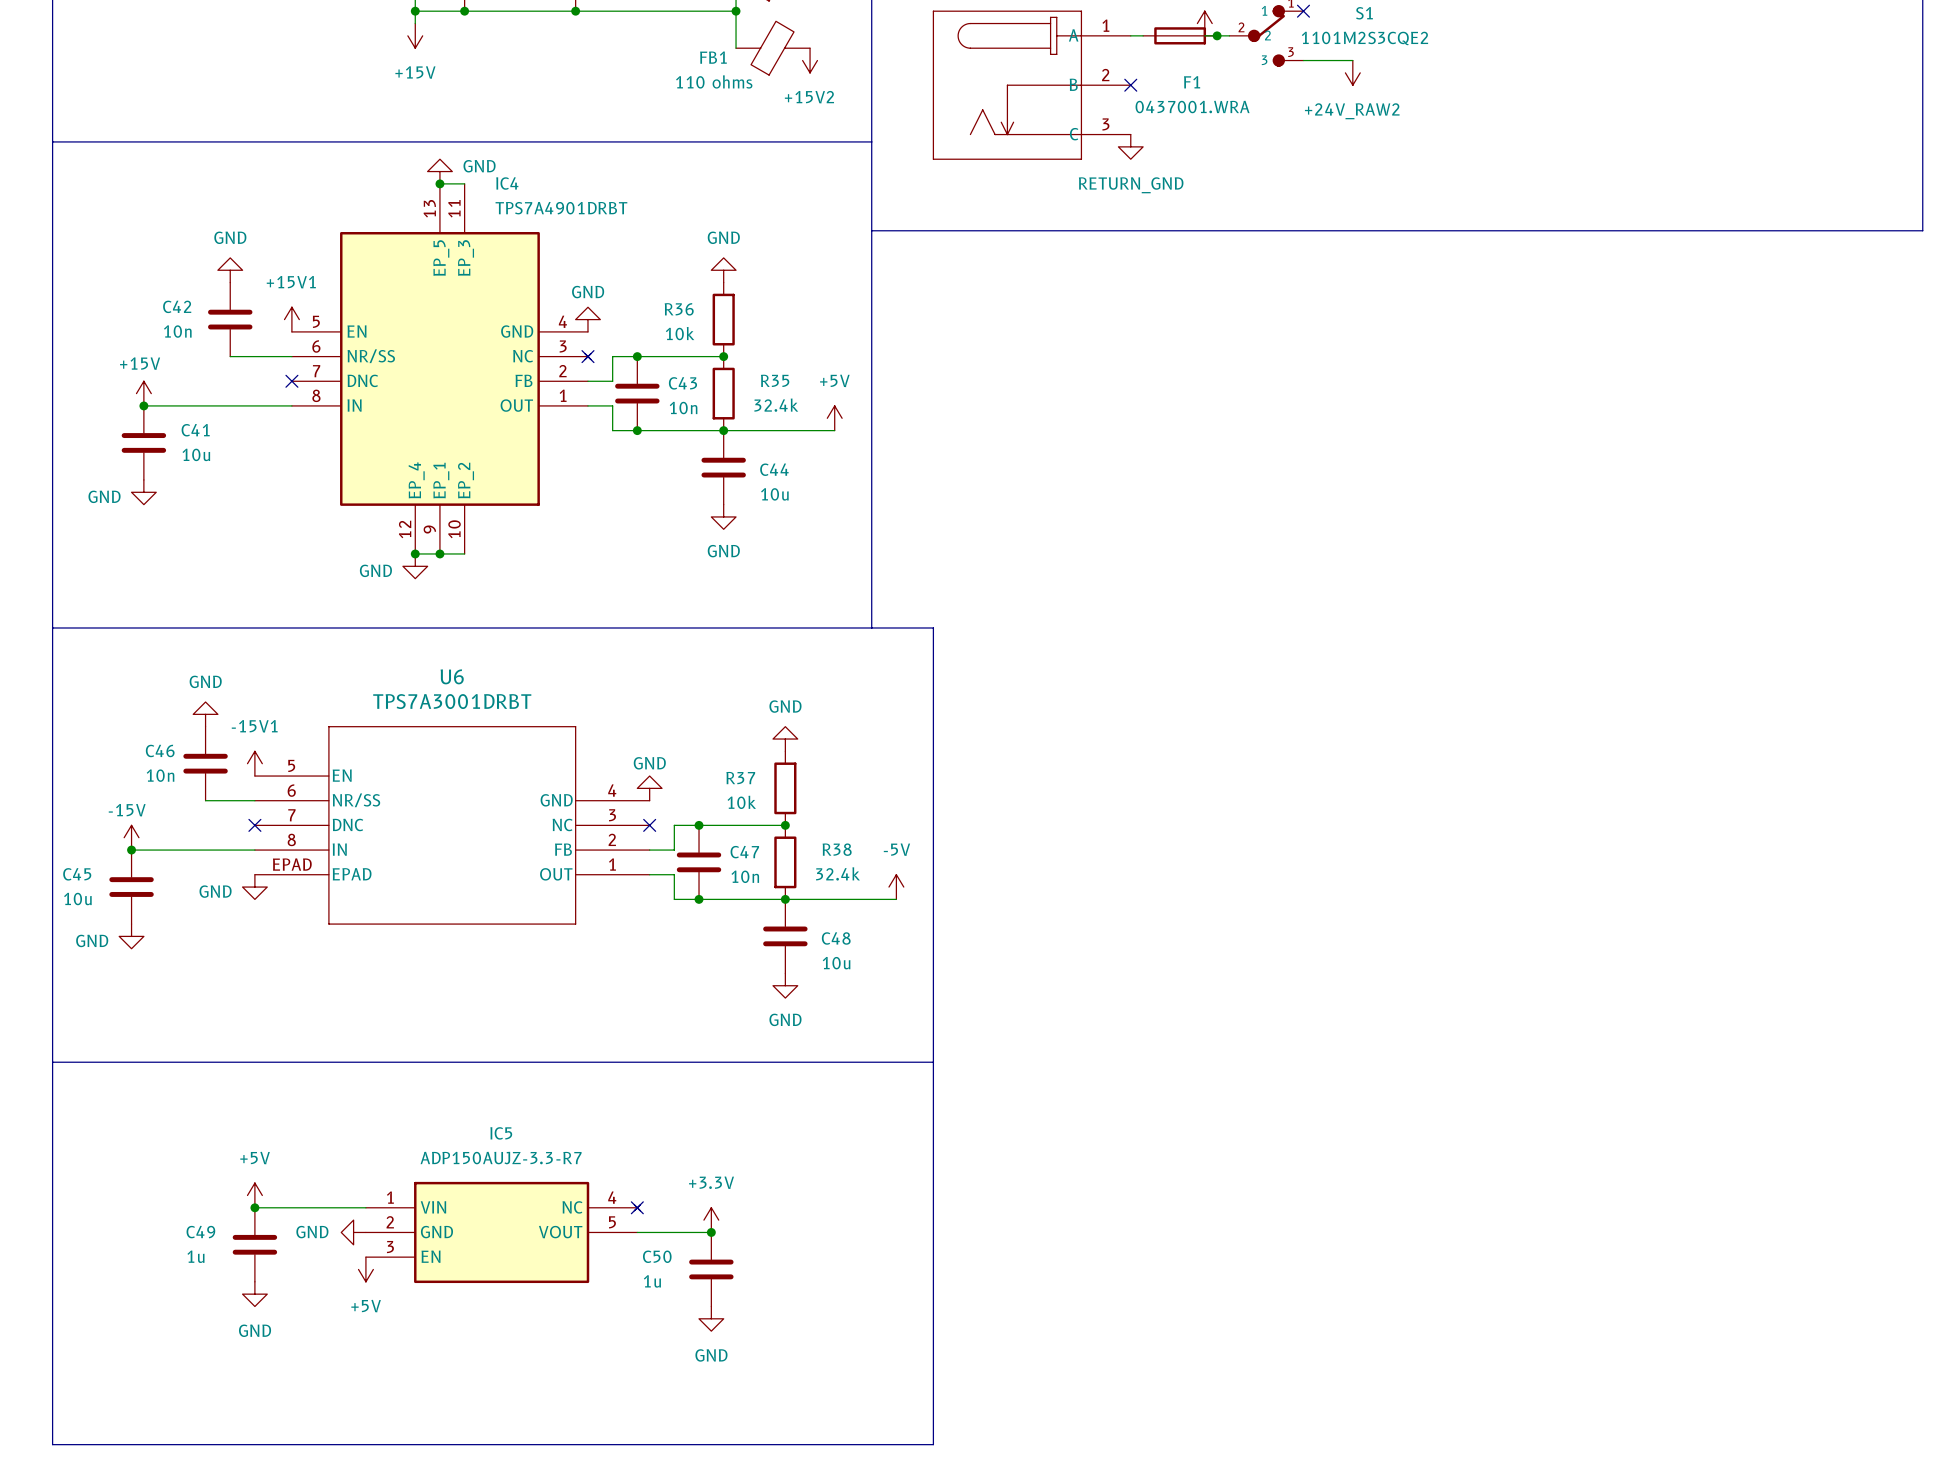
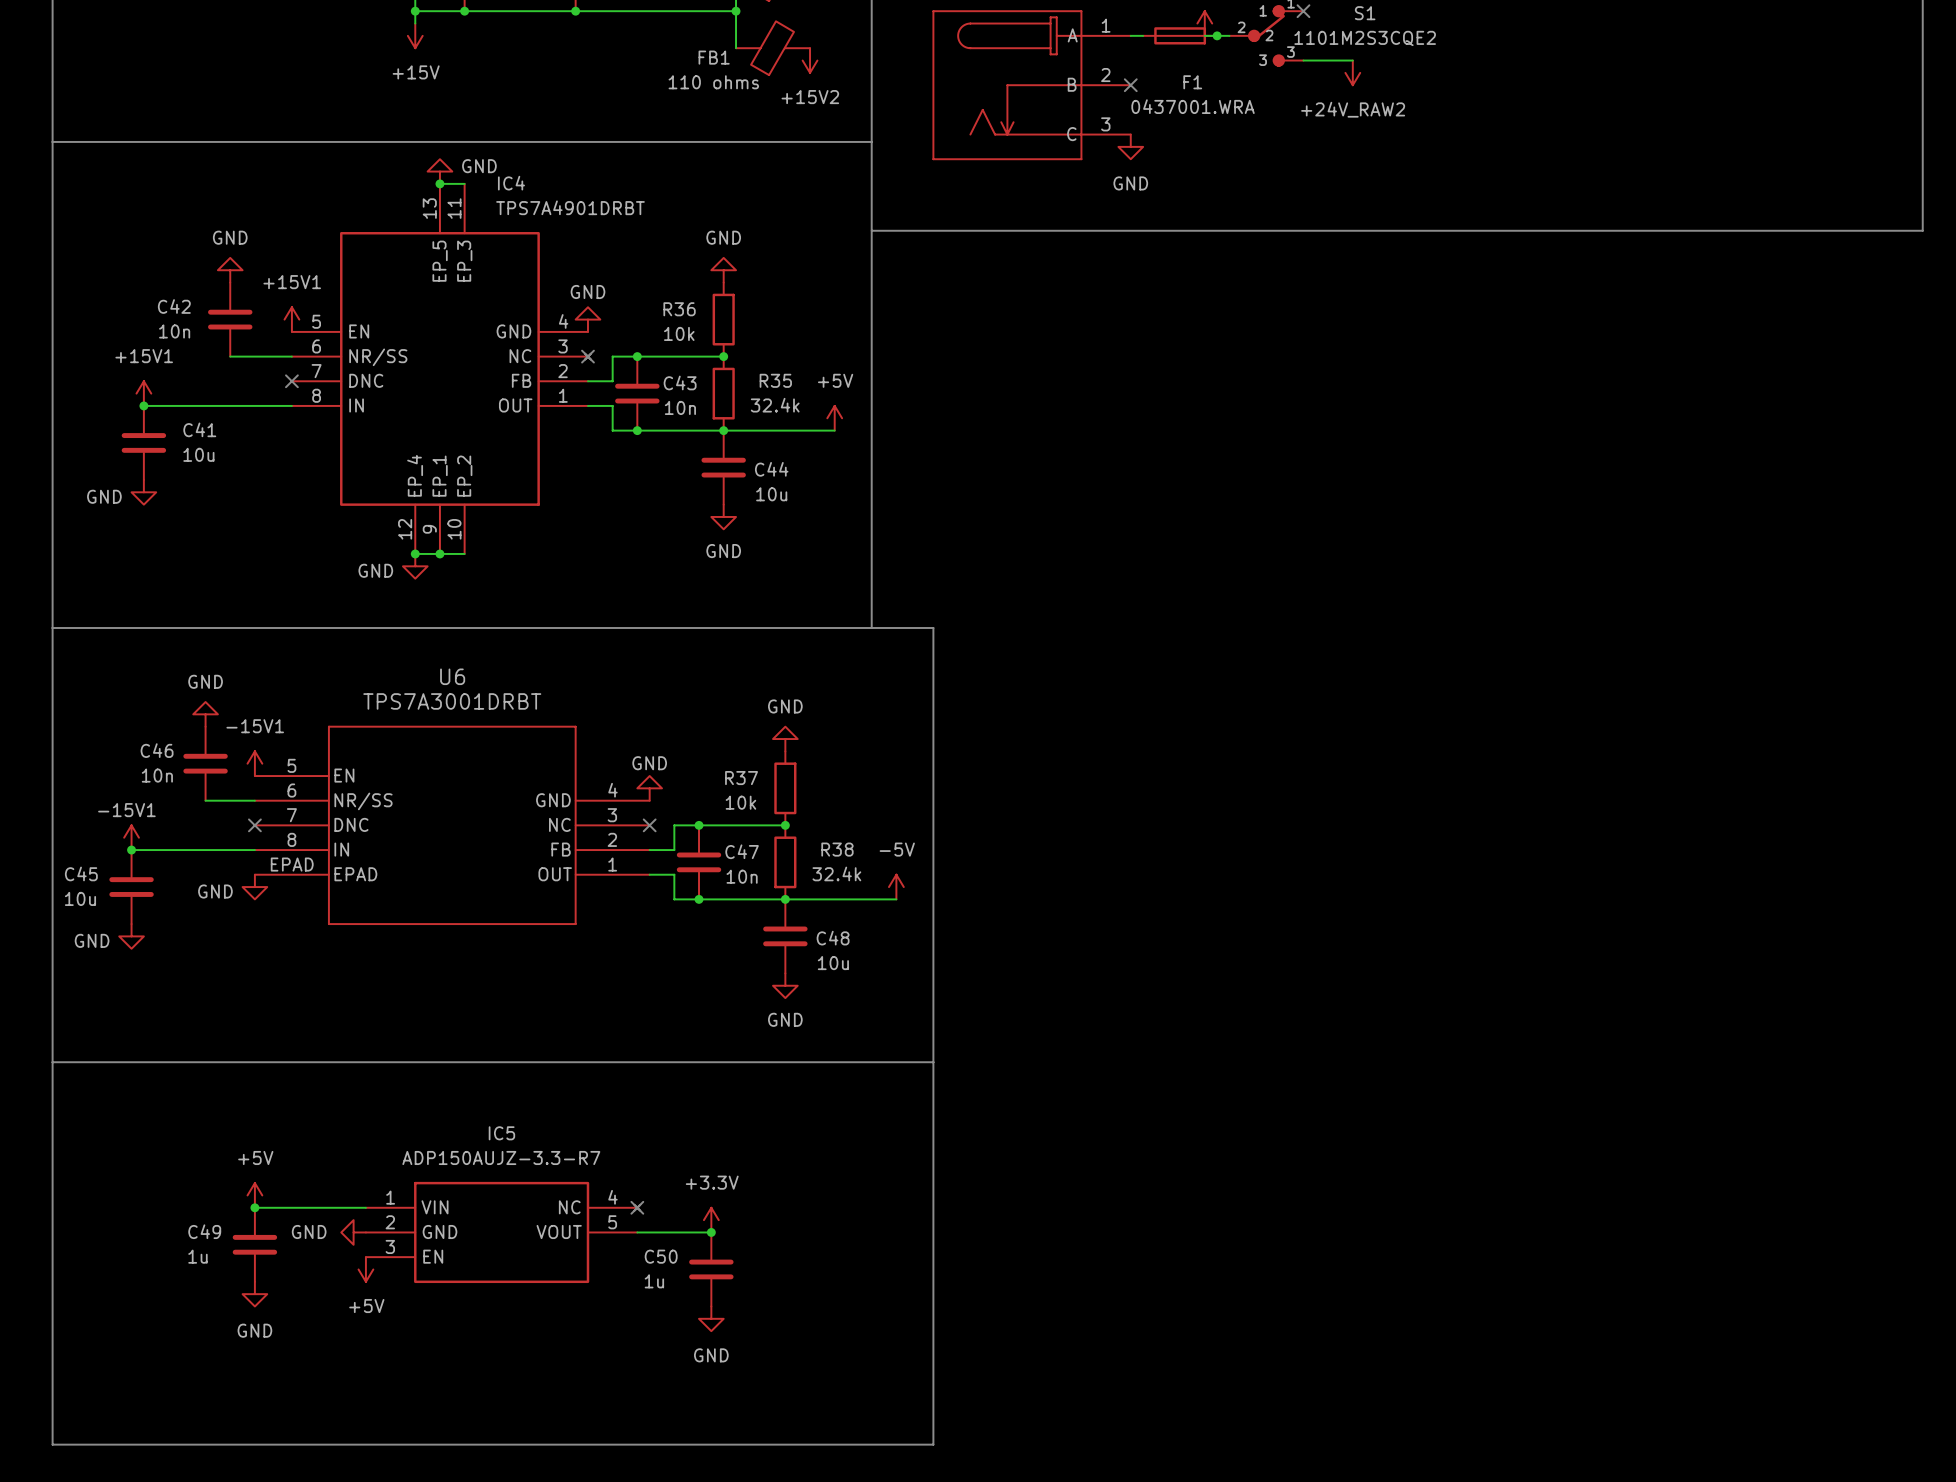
power symbol: RETURN_GND (1130, 146) -> GND (1130, 146)
power symbol: +15V (143, 393) -> +15V1 (143, 393)
power symbol: -15V (131, 837) -> -15V1 (131, 837)

